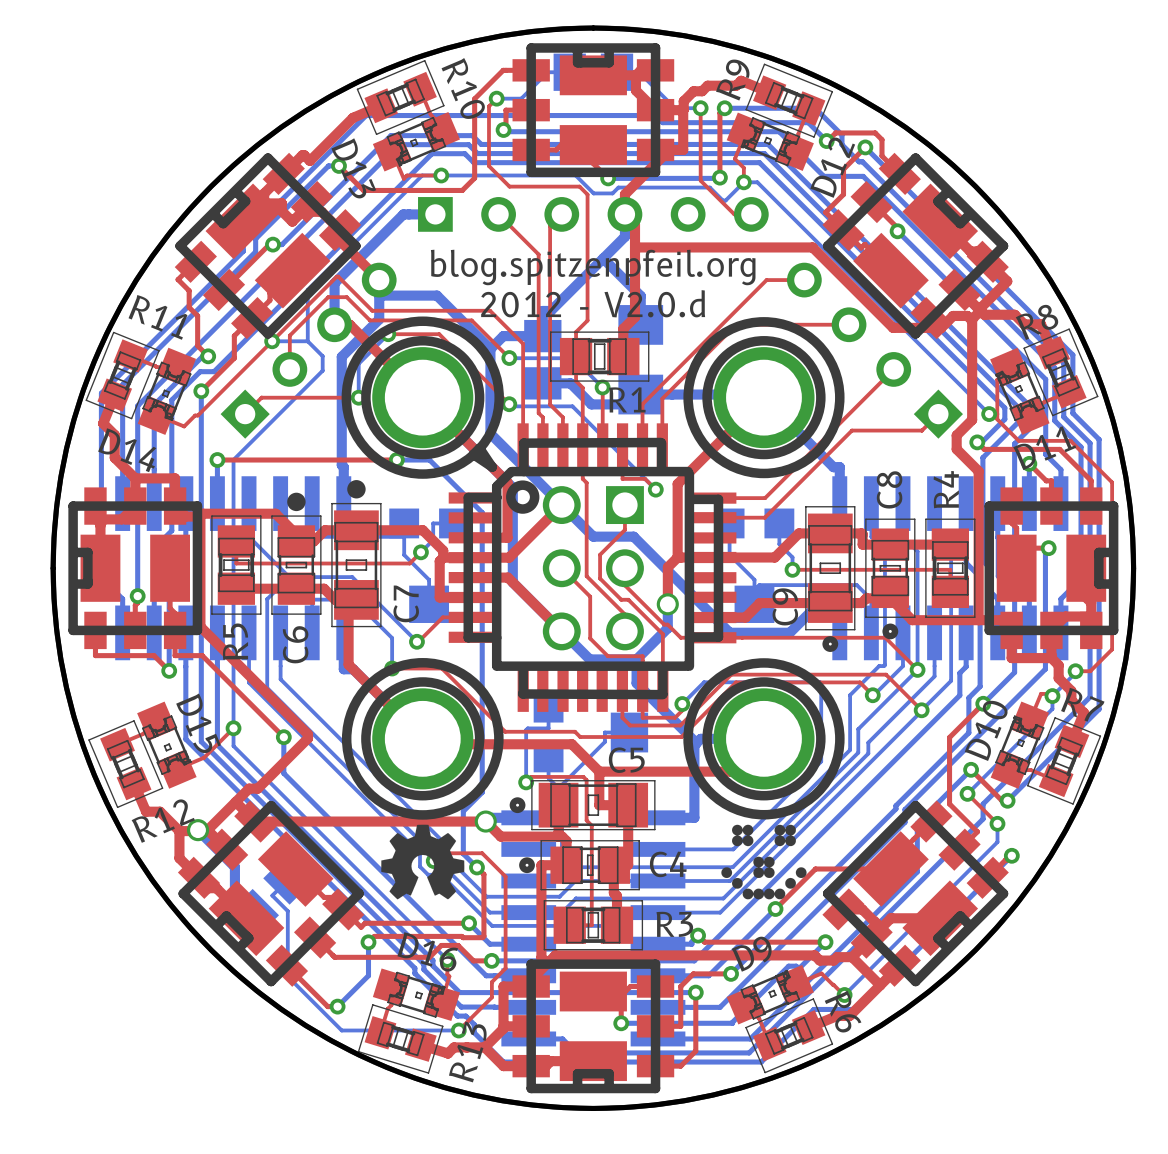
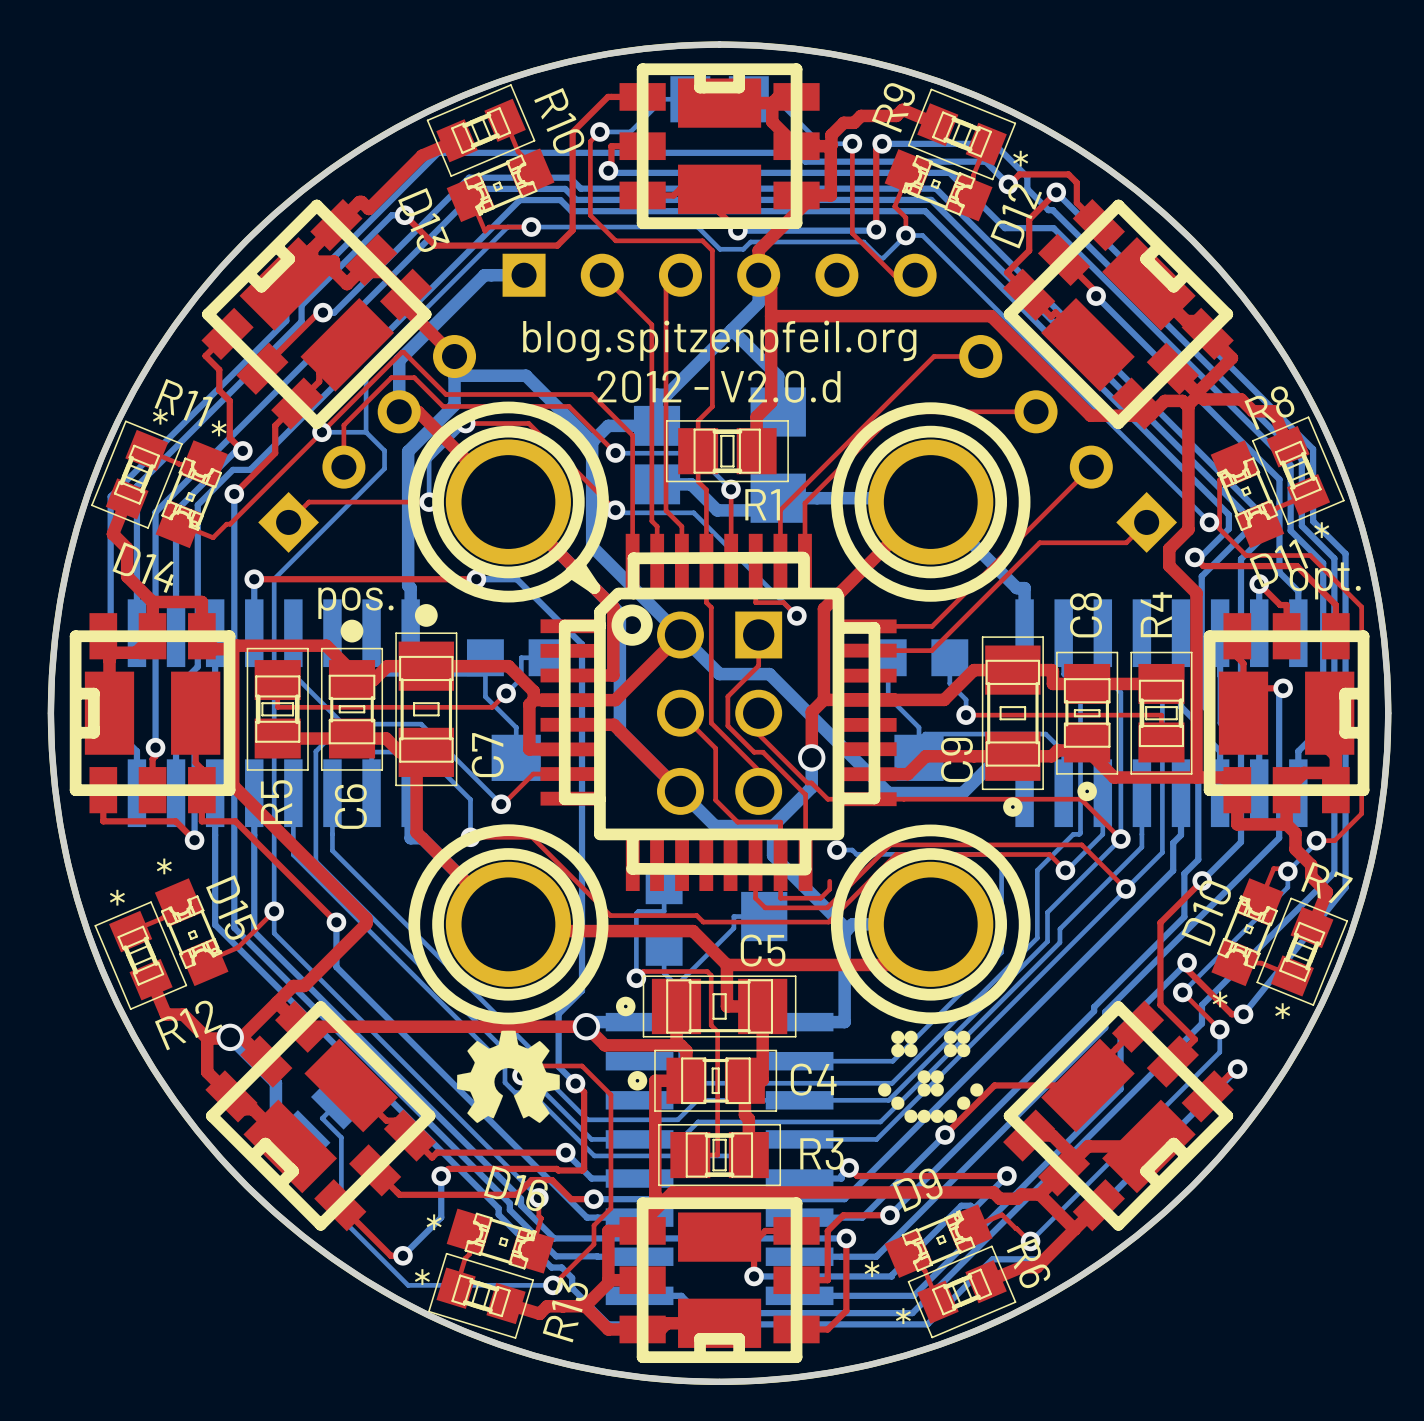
text: none -> * (1020, 158)
text: none -> * (160, 416)
text: none -> * (219, 428)
text: none -> * (1321, 530)
text: none -> opt. (1325, 580)
text: none -> pos. (355, 603)
bottom track: (704, 682) (682, 704) -> (856, 854) (852, 850) (836, 850)
text: none -> * (164, 866)
via position: (682, 704) -> (836, 850)
bottom track: (1099, 709) (1007, 800) -> (1345, 887) (1243, 1014)
text: none -> * (117, 897)
top track: (971, 769) (1002, 800) (1007, 800) -> (1187, 962) (1187, 969) (1231, 1014) (1243, 1014)
via position: (1007, 800) -> (1243, 1014)
text: none -> * (1220, 999)
text: none -> * (1282, 1011)
text: none -> * (434, 1222)
text: none -> * (872, 1269)
text: none -> * (422, 1277)
text: none -> * (903, 1316)

